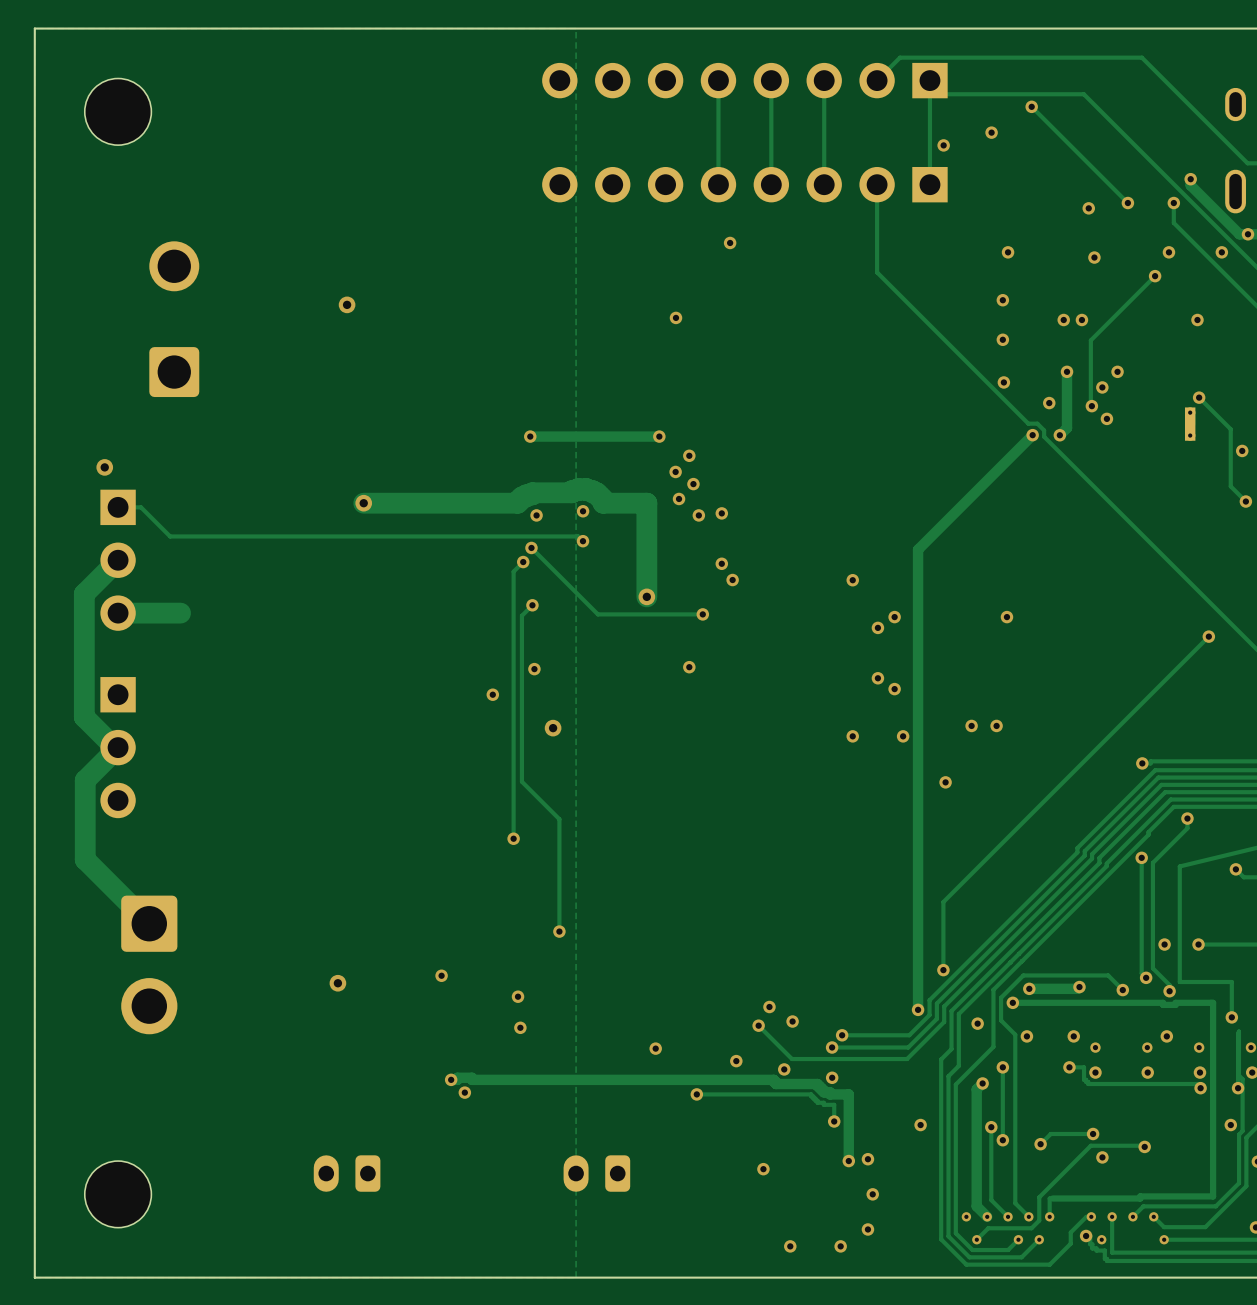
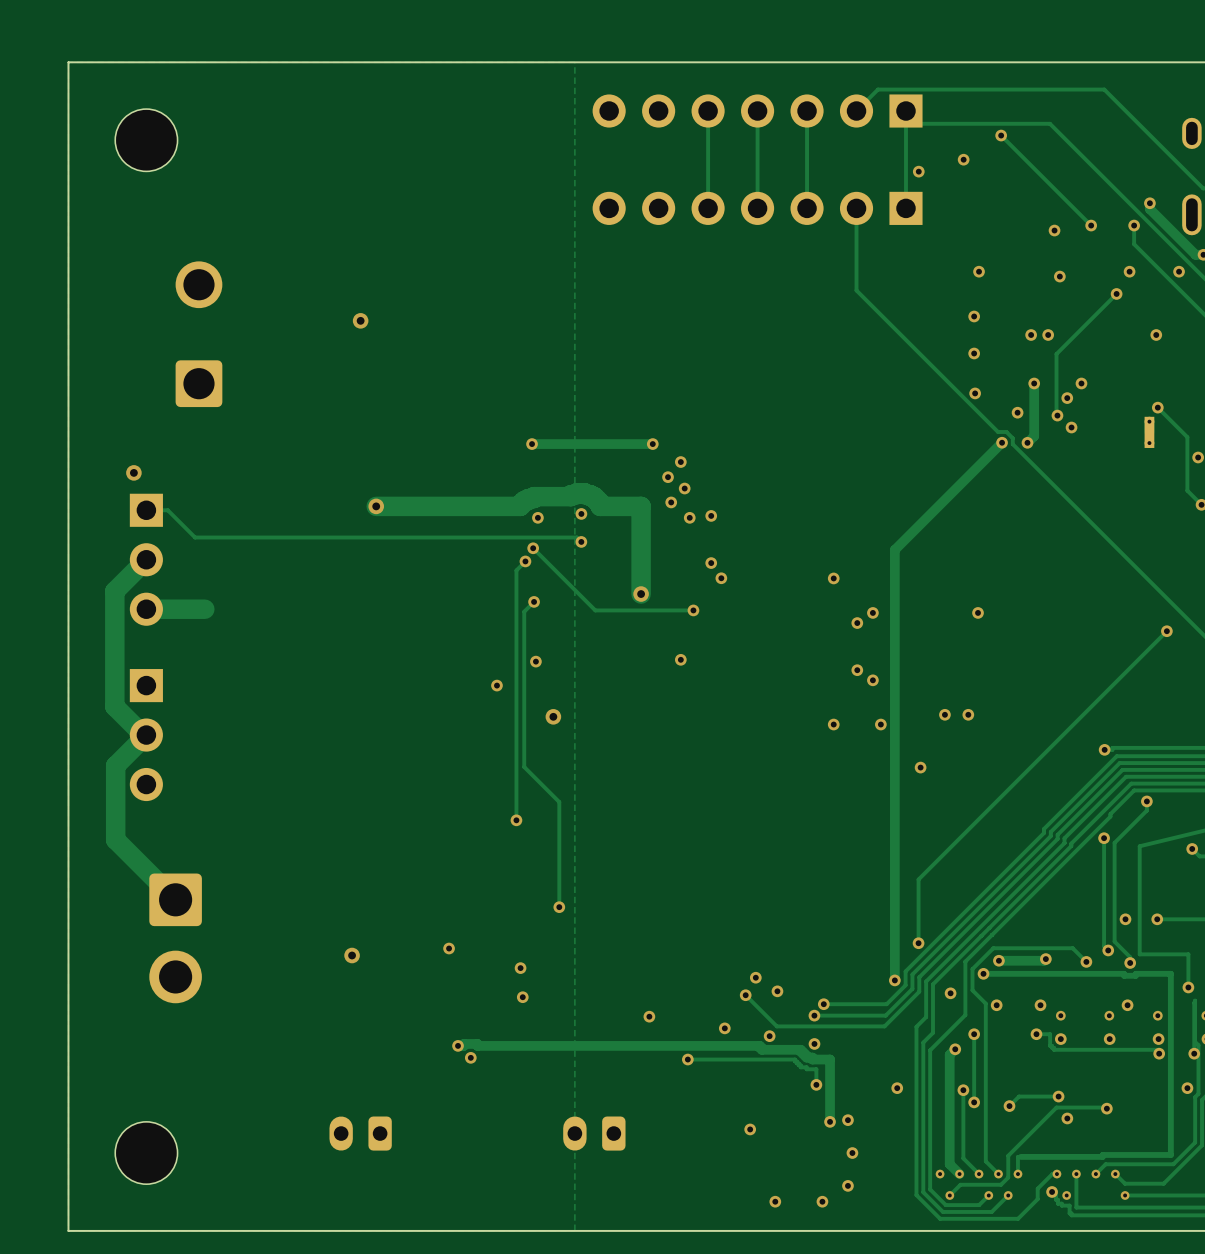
part: (744, 80) -> none
part: (744, 184) -> none
via: (730, 242) -> none
via: (675, 317) -> none

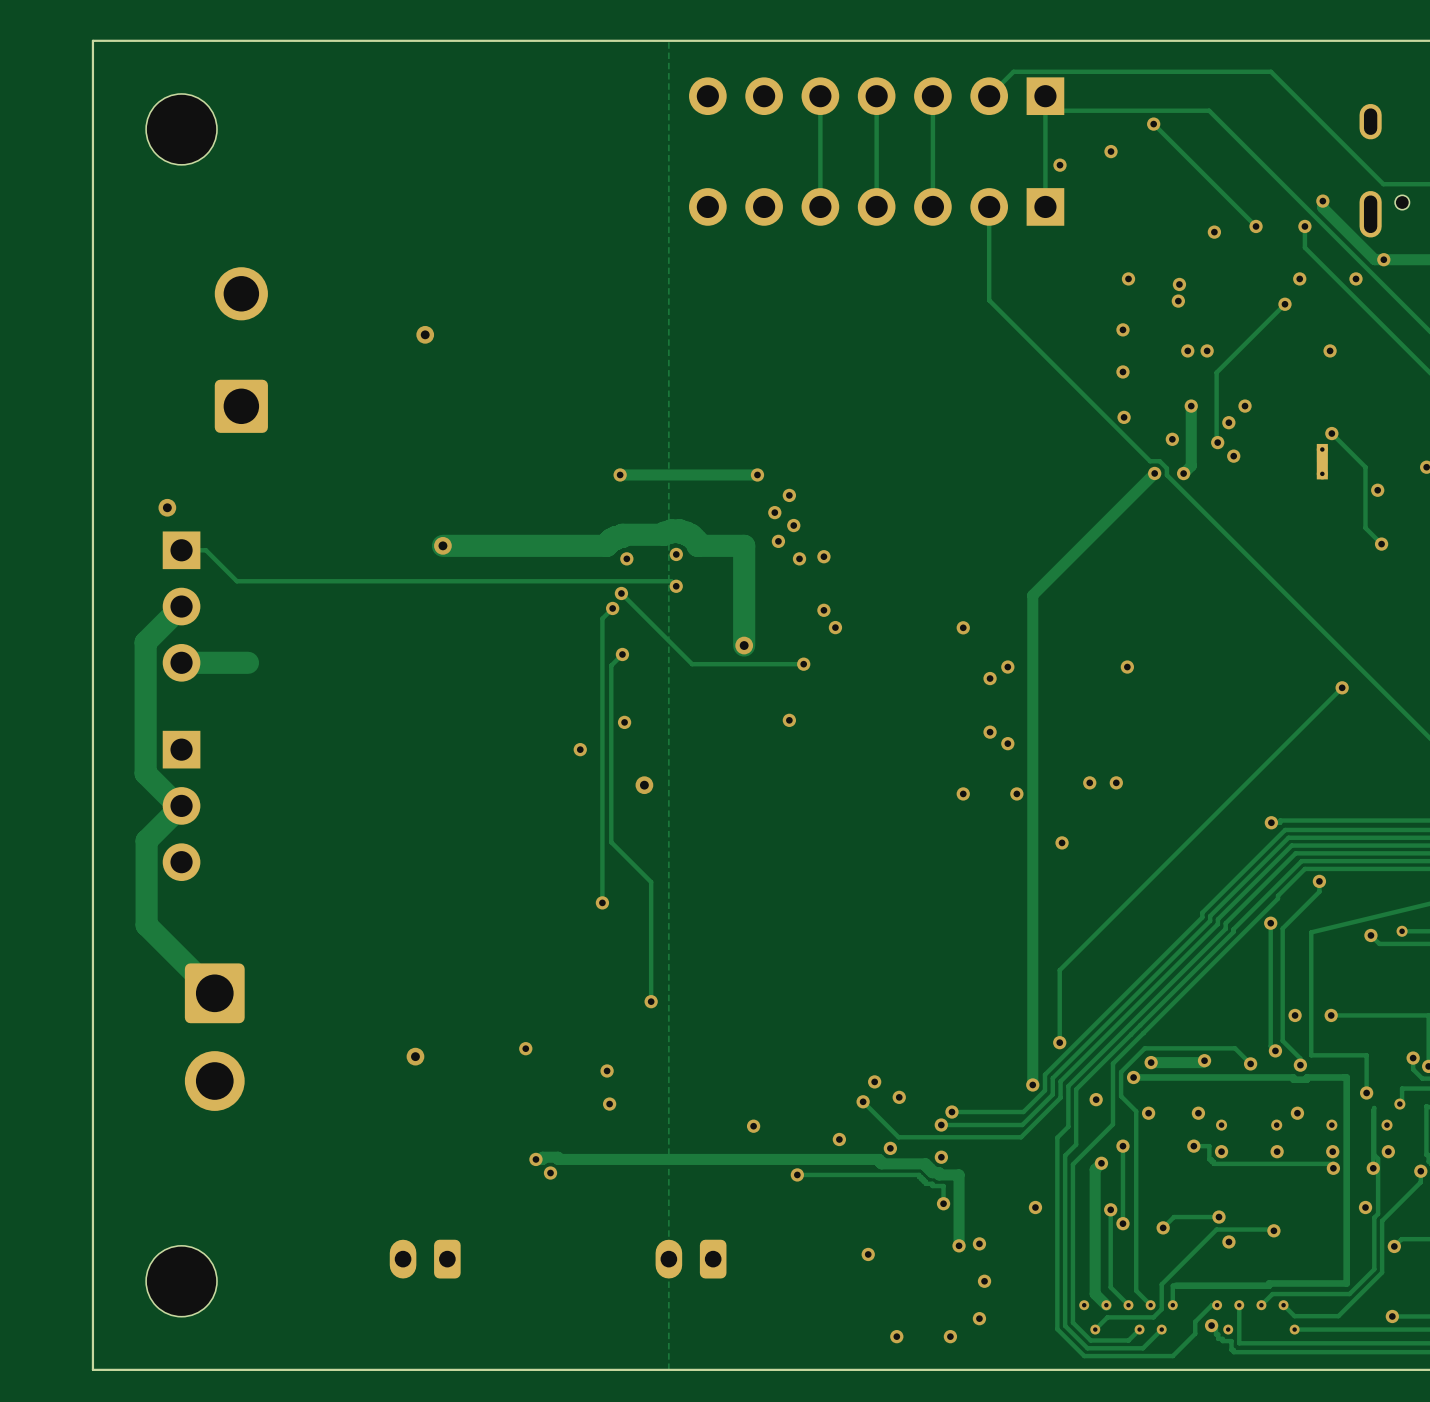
via: none -> (1179, 284)
via: (1059, 276) -> none
via: none -> (1178, 301)

